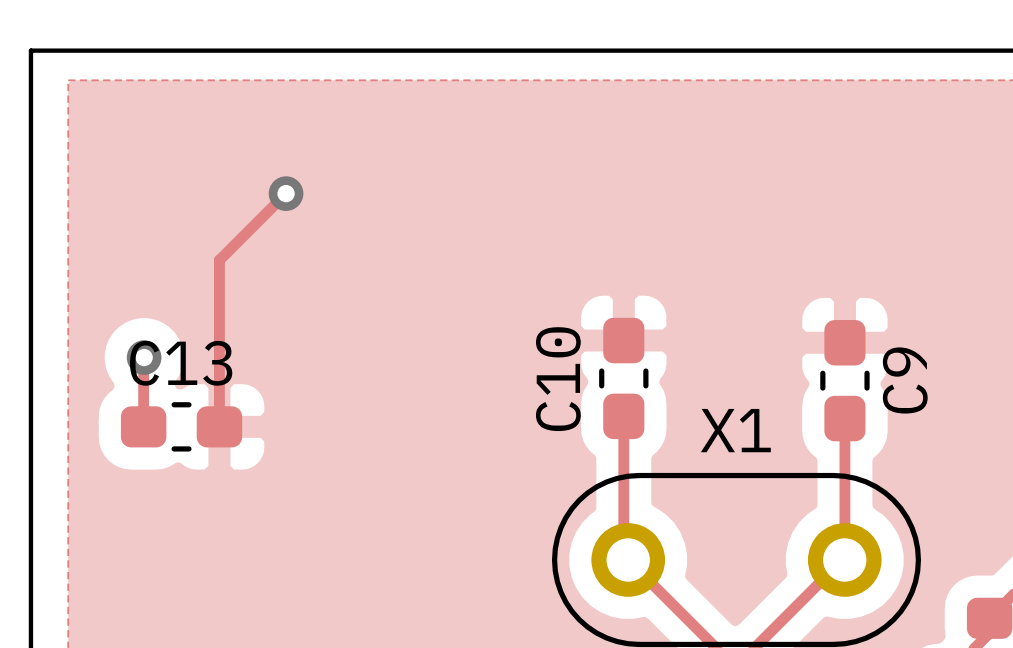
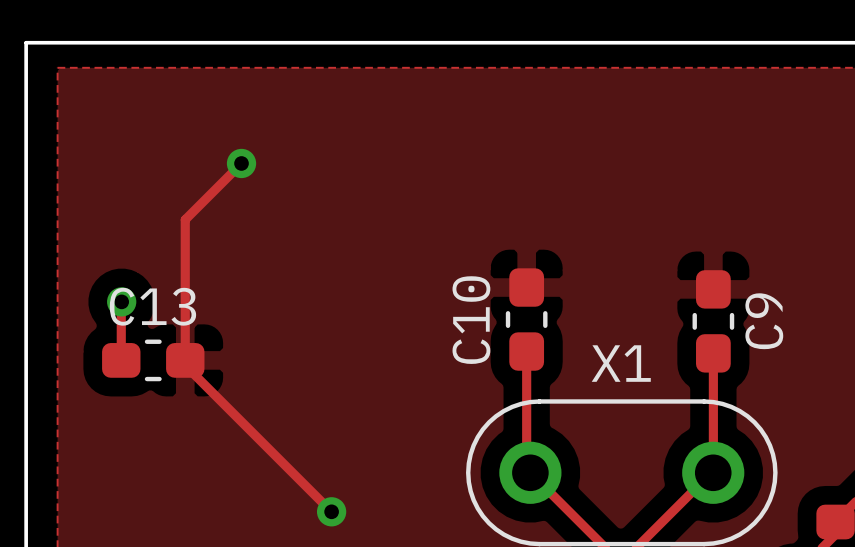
track: none -> (185, 360) (185, 365) (331, 511)
via: none -> (331, 511)

